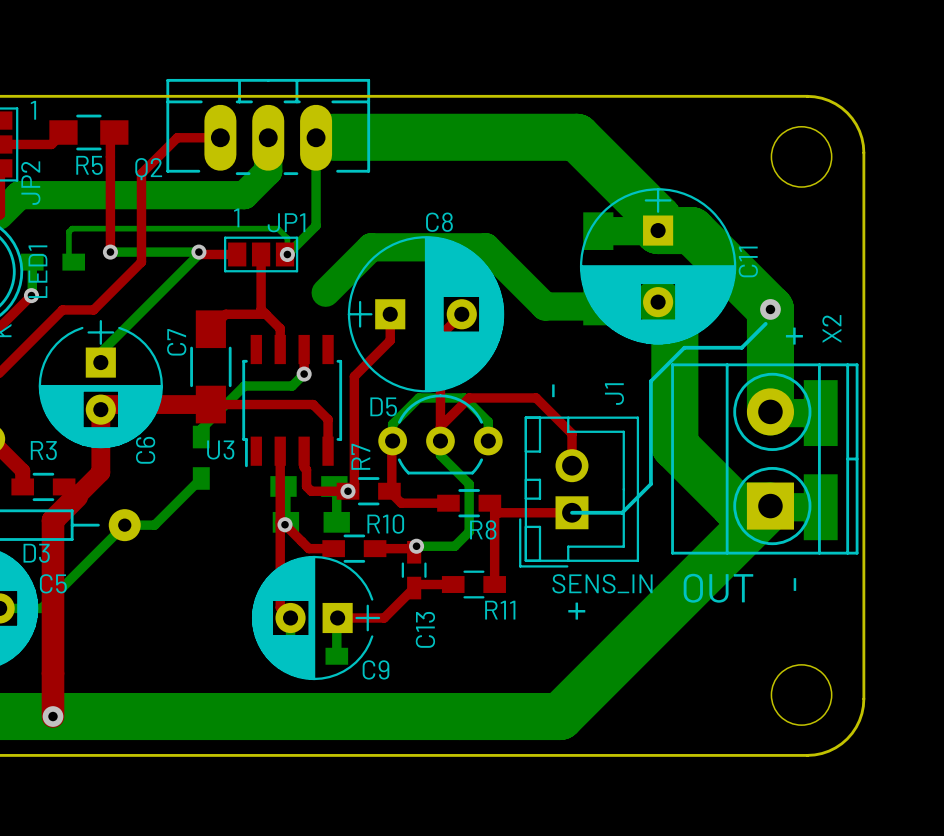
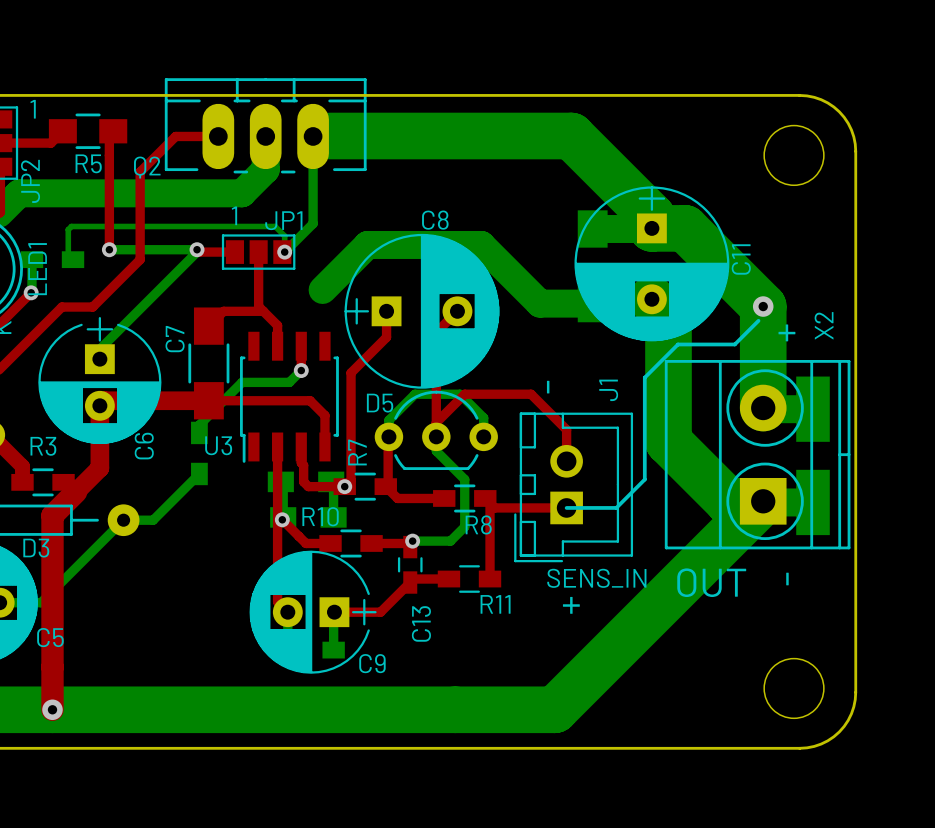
R10 name position: R10 (385, 524) -> R10 (320, 516)
C5 name position: C5 (53, 583) -> C5 (50, 637)

